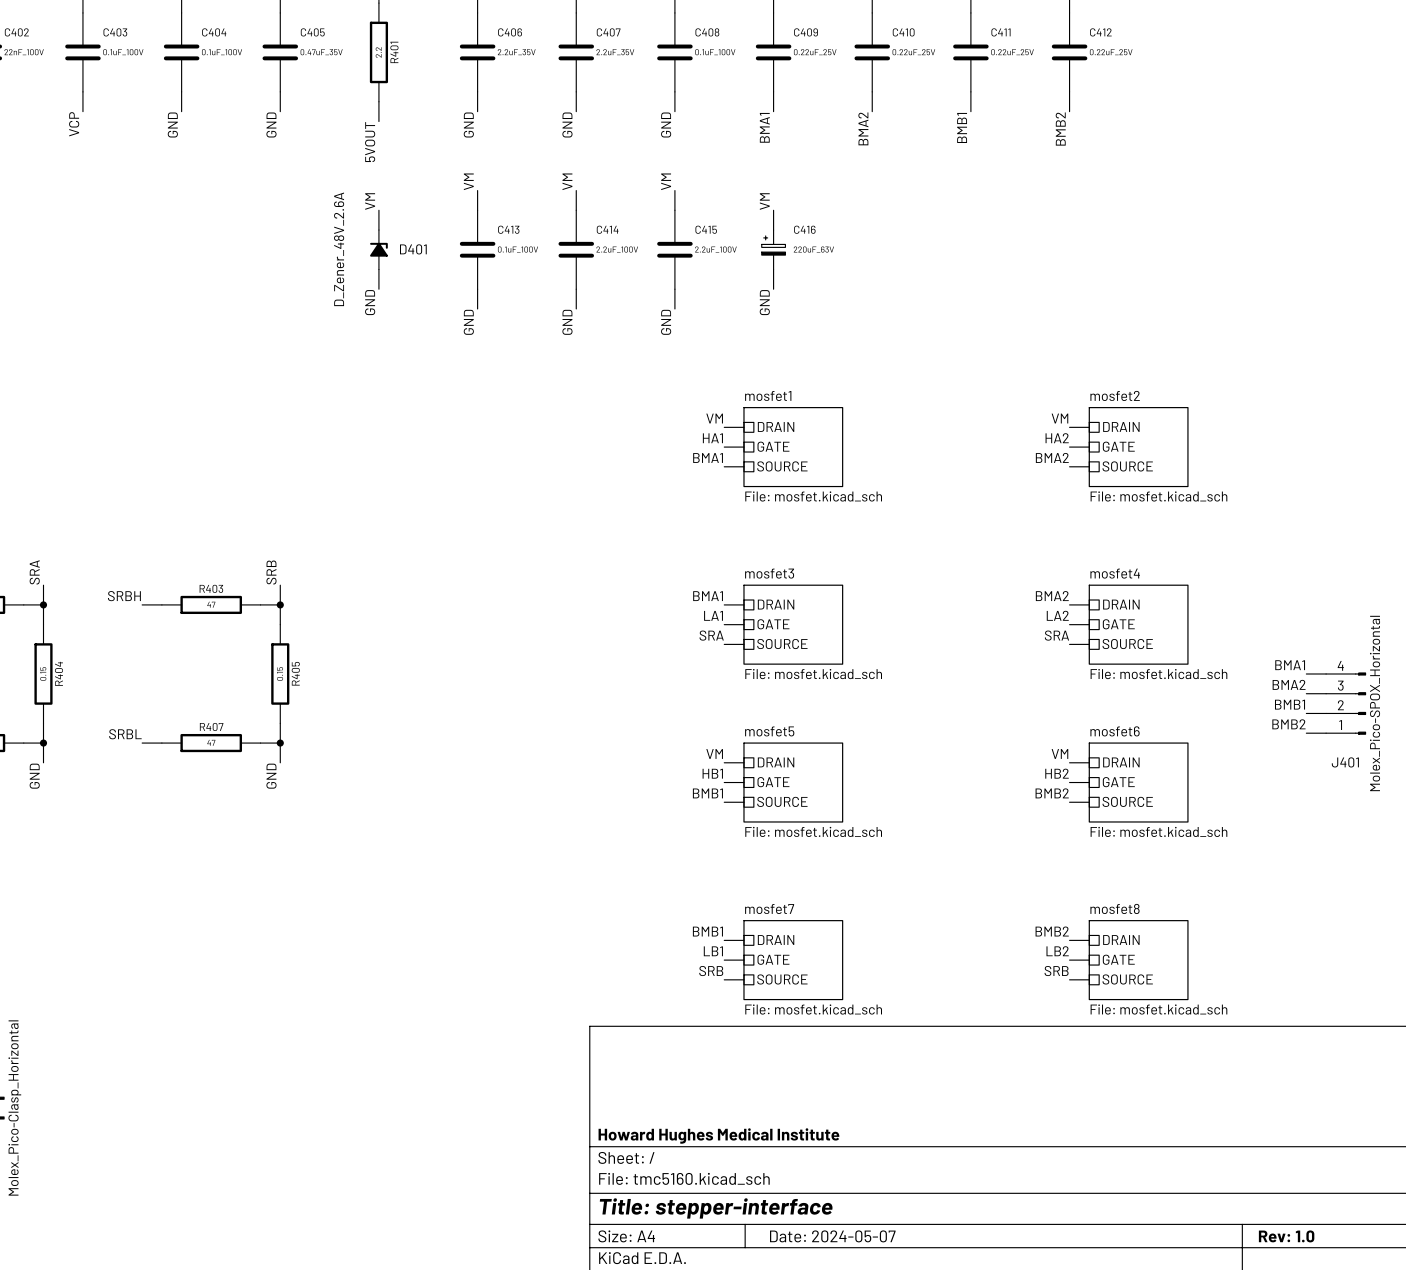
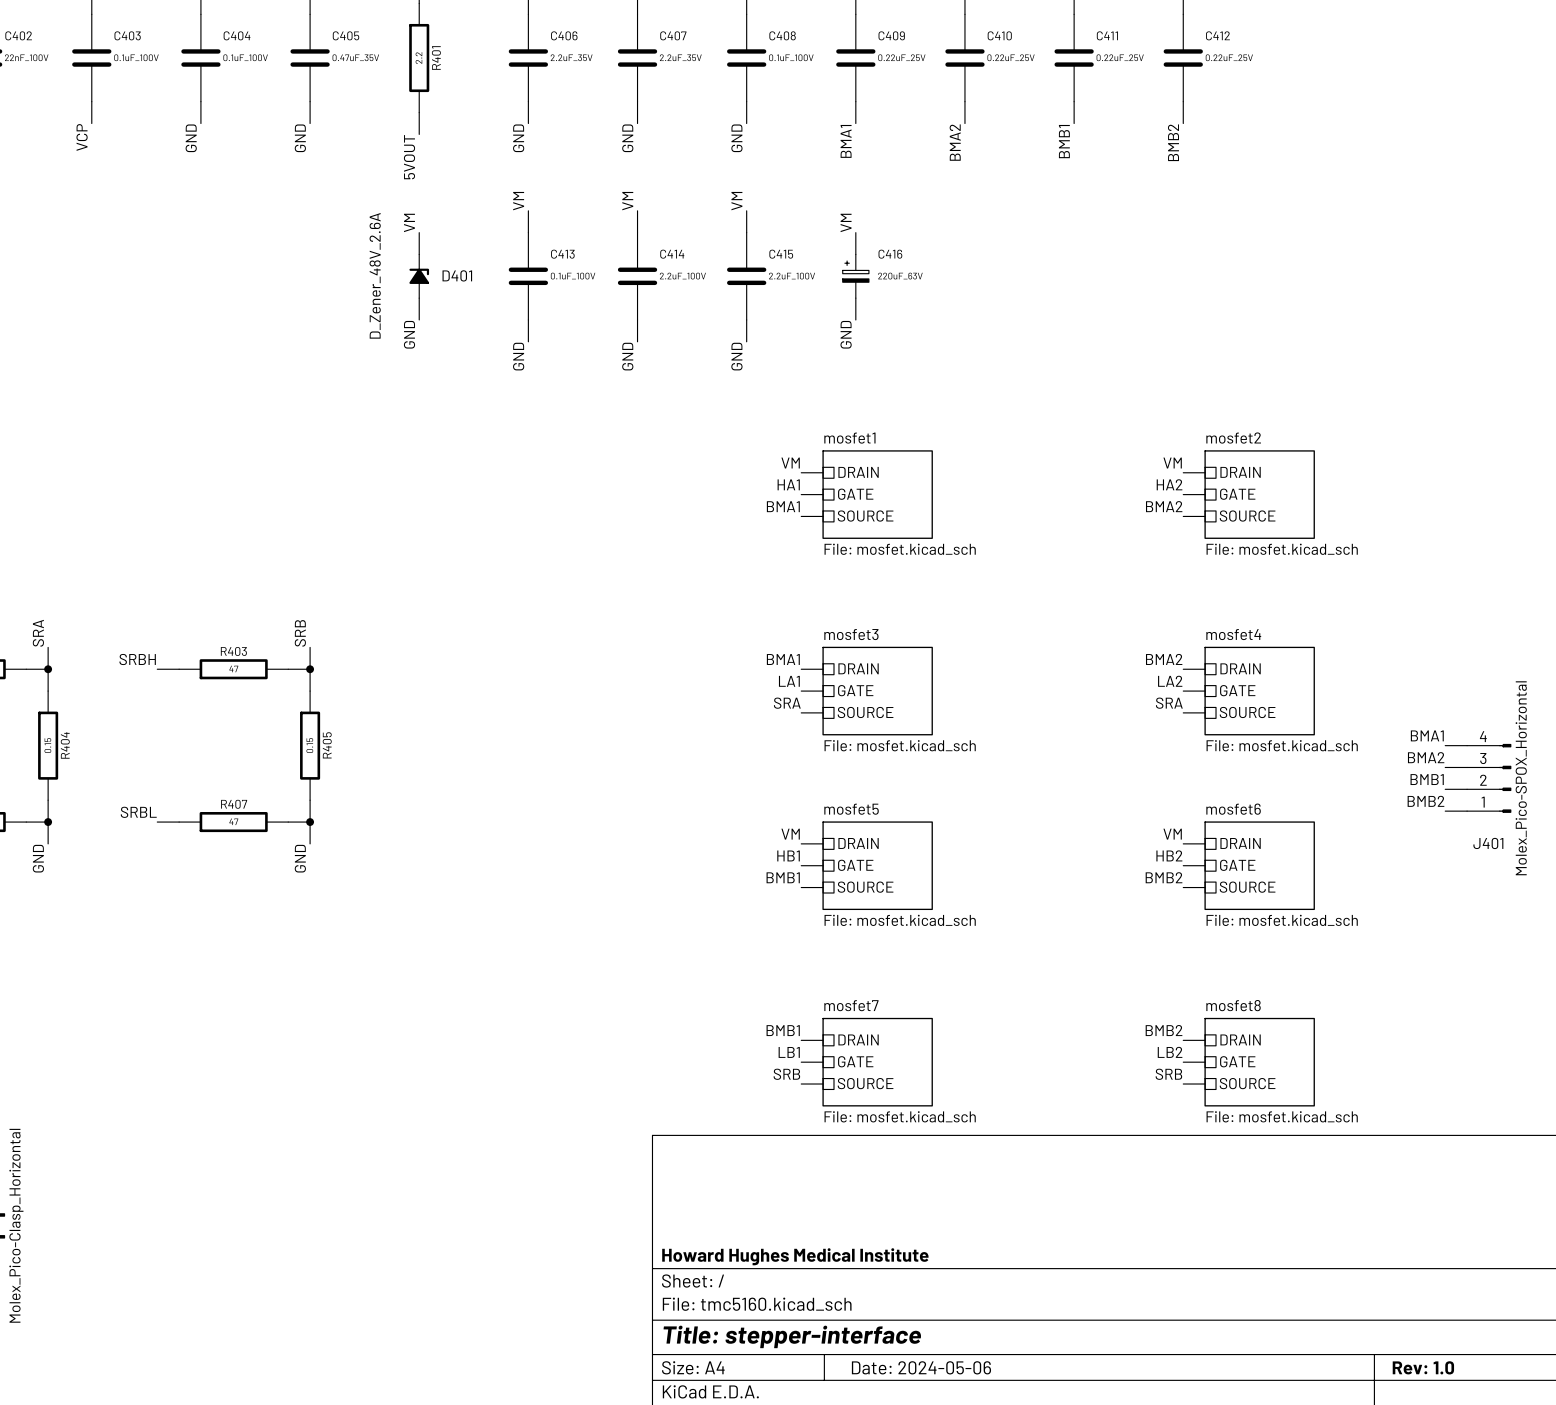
title block: Date: 2024-05-07 (832, 1236) -> Date: 2024-05-06 (921, 1367)

